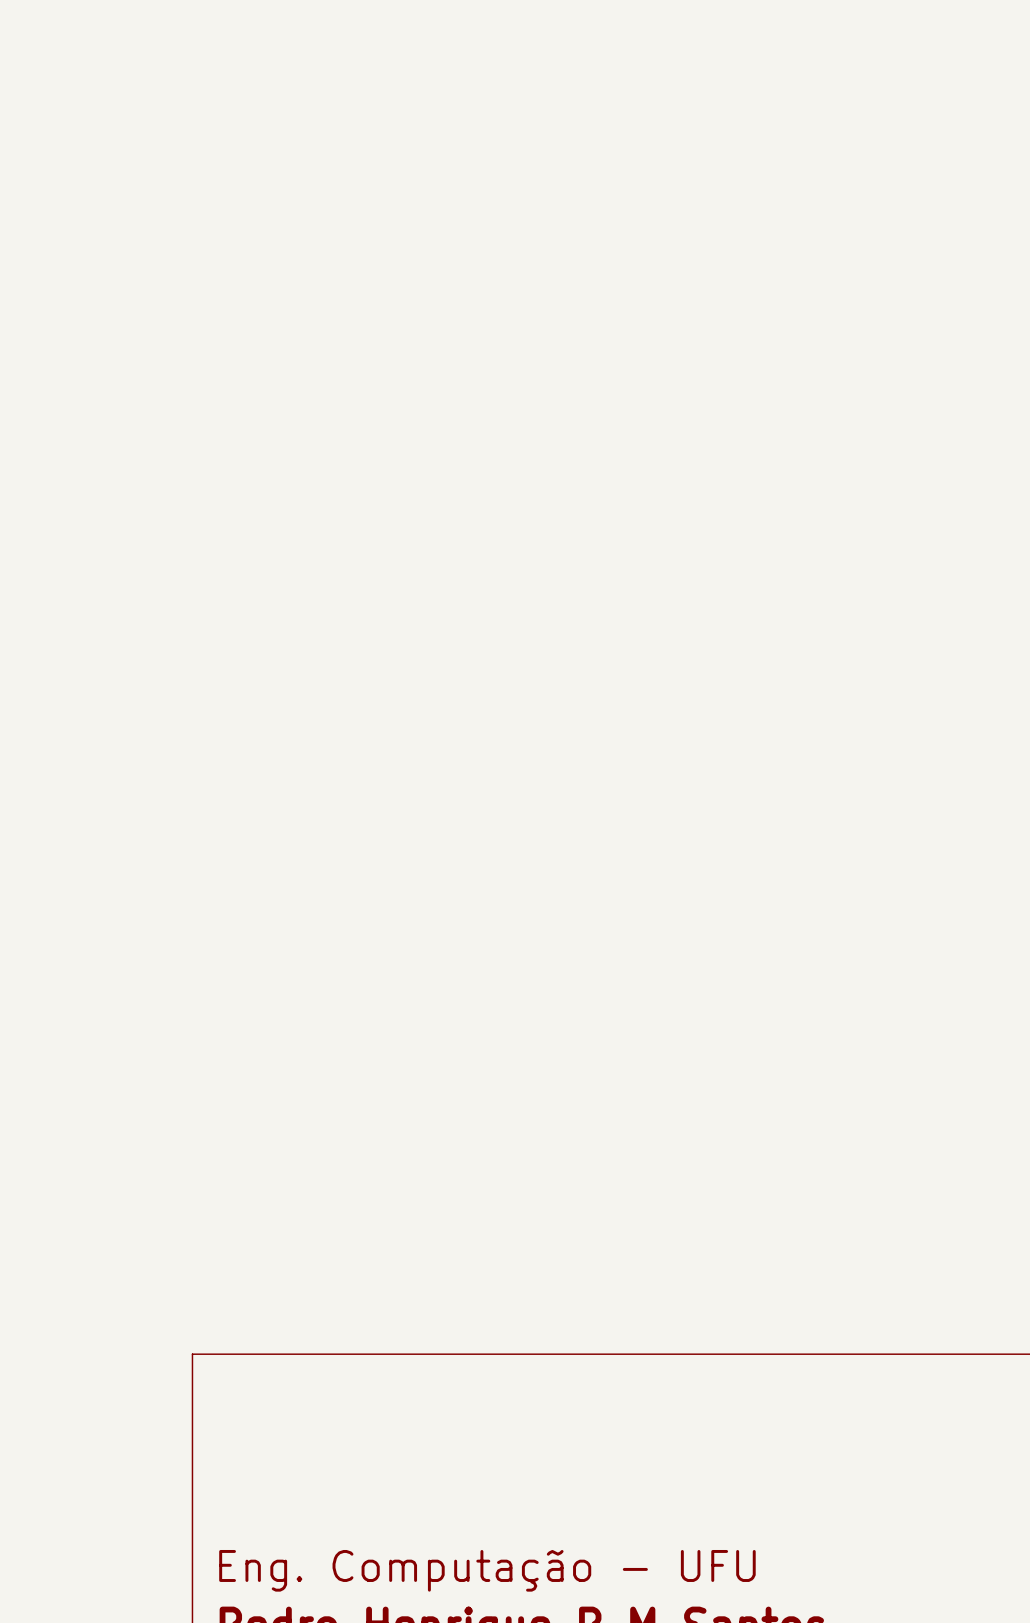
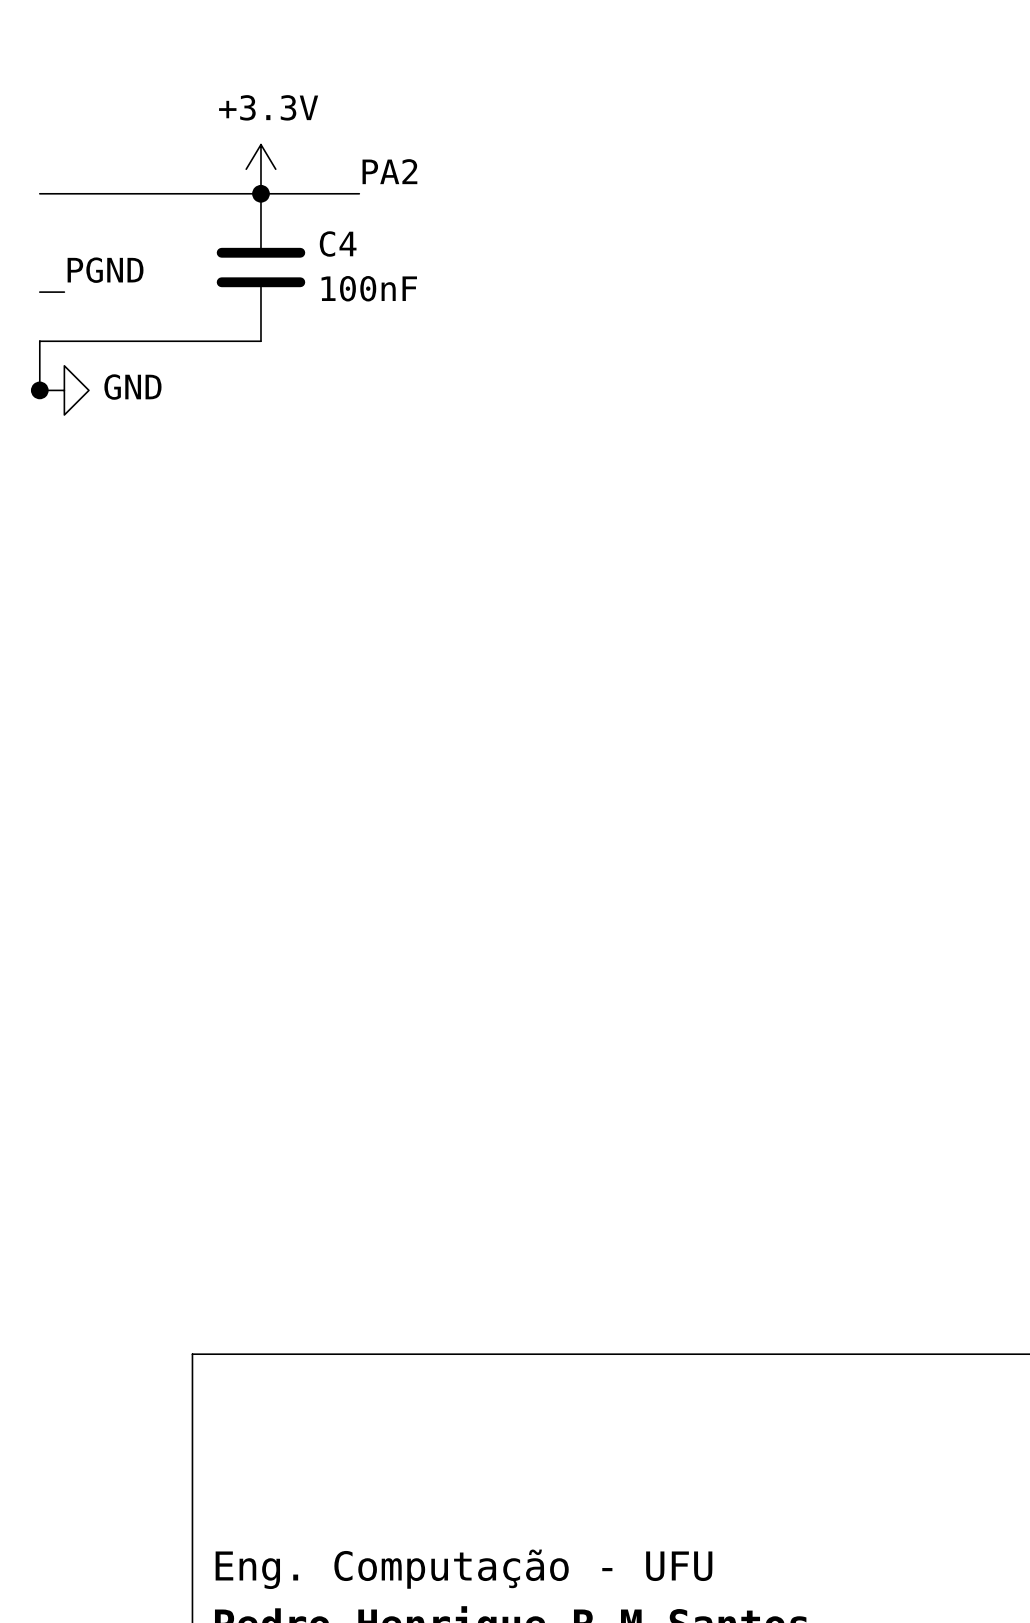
power symbol: none -> +3.3V (260, 169)
label: none -> PA2 (389, 171)
wire: none -> (39, 193) (359, 193)
junction: none -> (260, 193)
C4: none -> 100nF (260, 267)
label: none -> PGND (105, 270)
wire: none -> (39, 292) (64, 292)
wire: none -> (260, 341) (39, 341) (39, 390)
junction: none -> (39, 390)
power symbol: none -> GND (64, 390)

